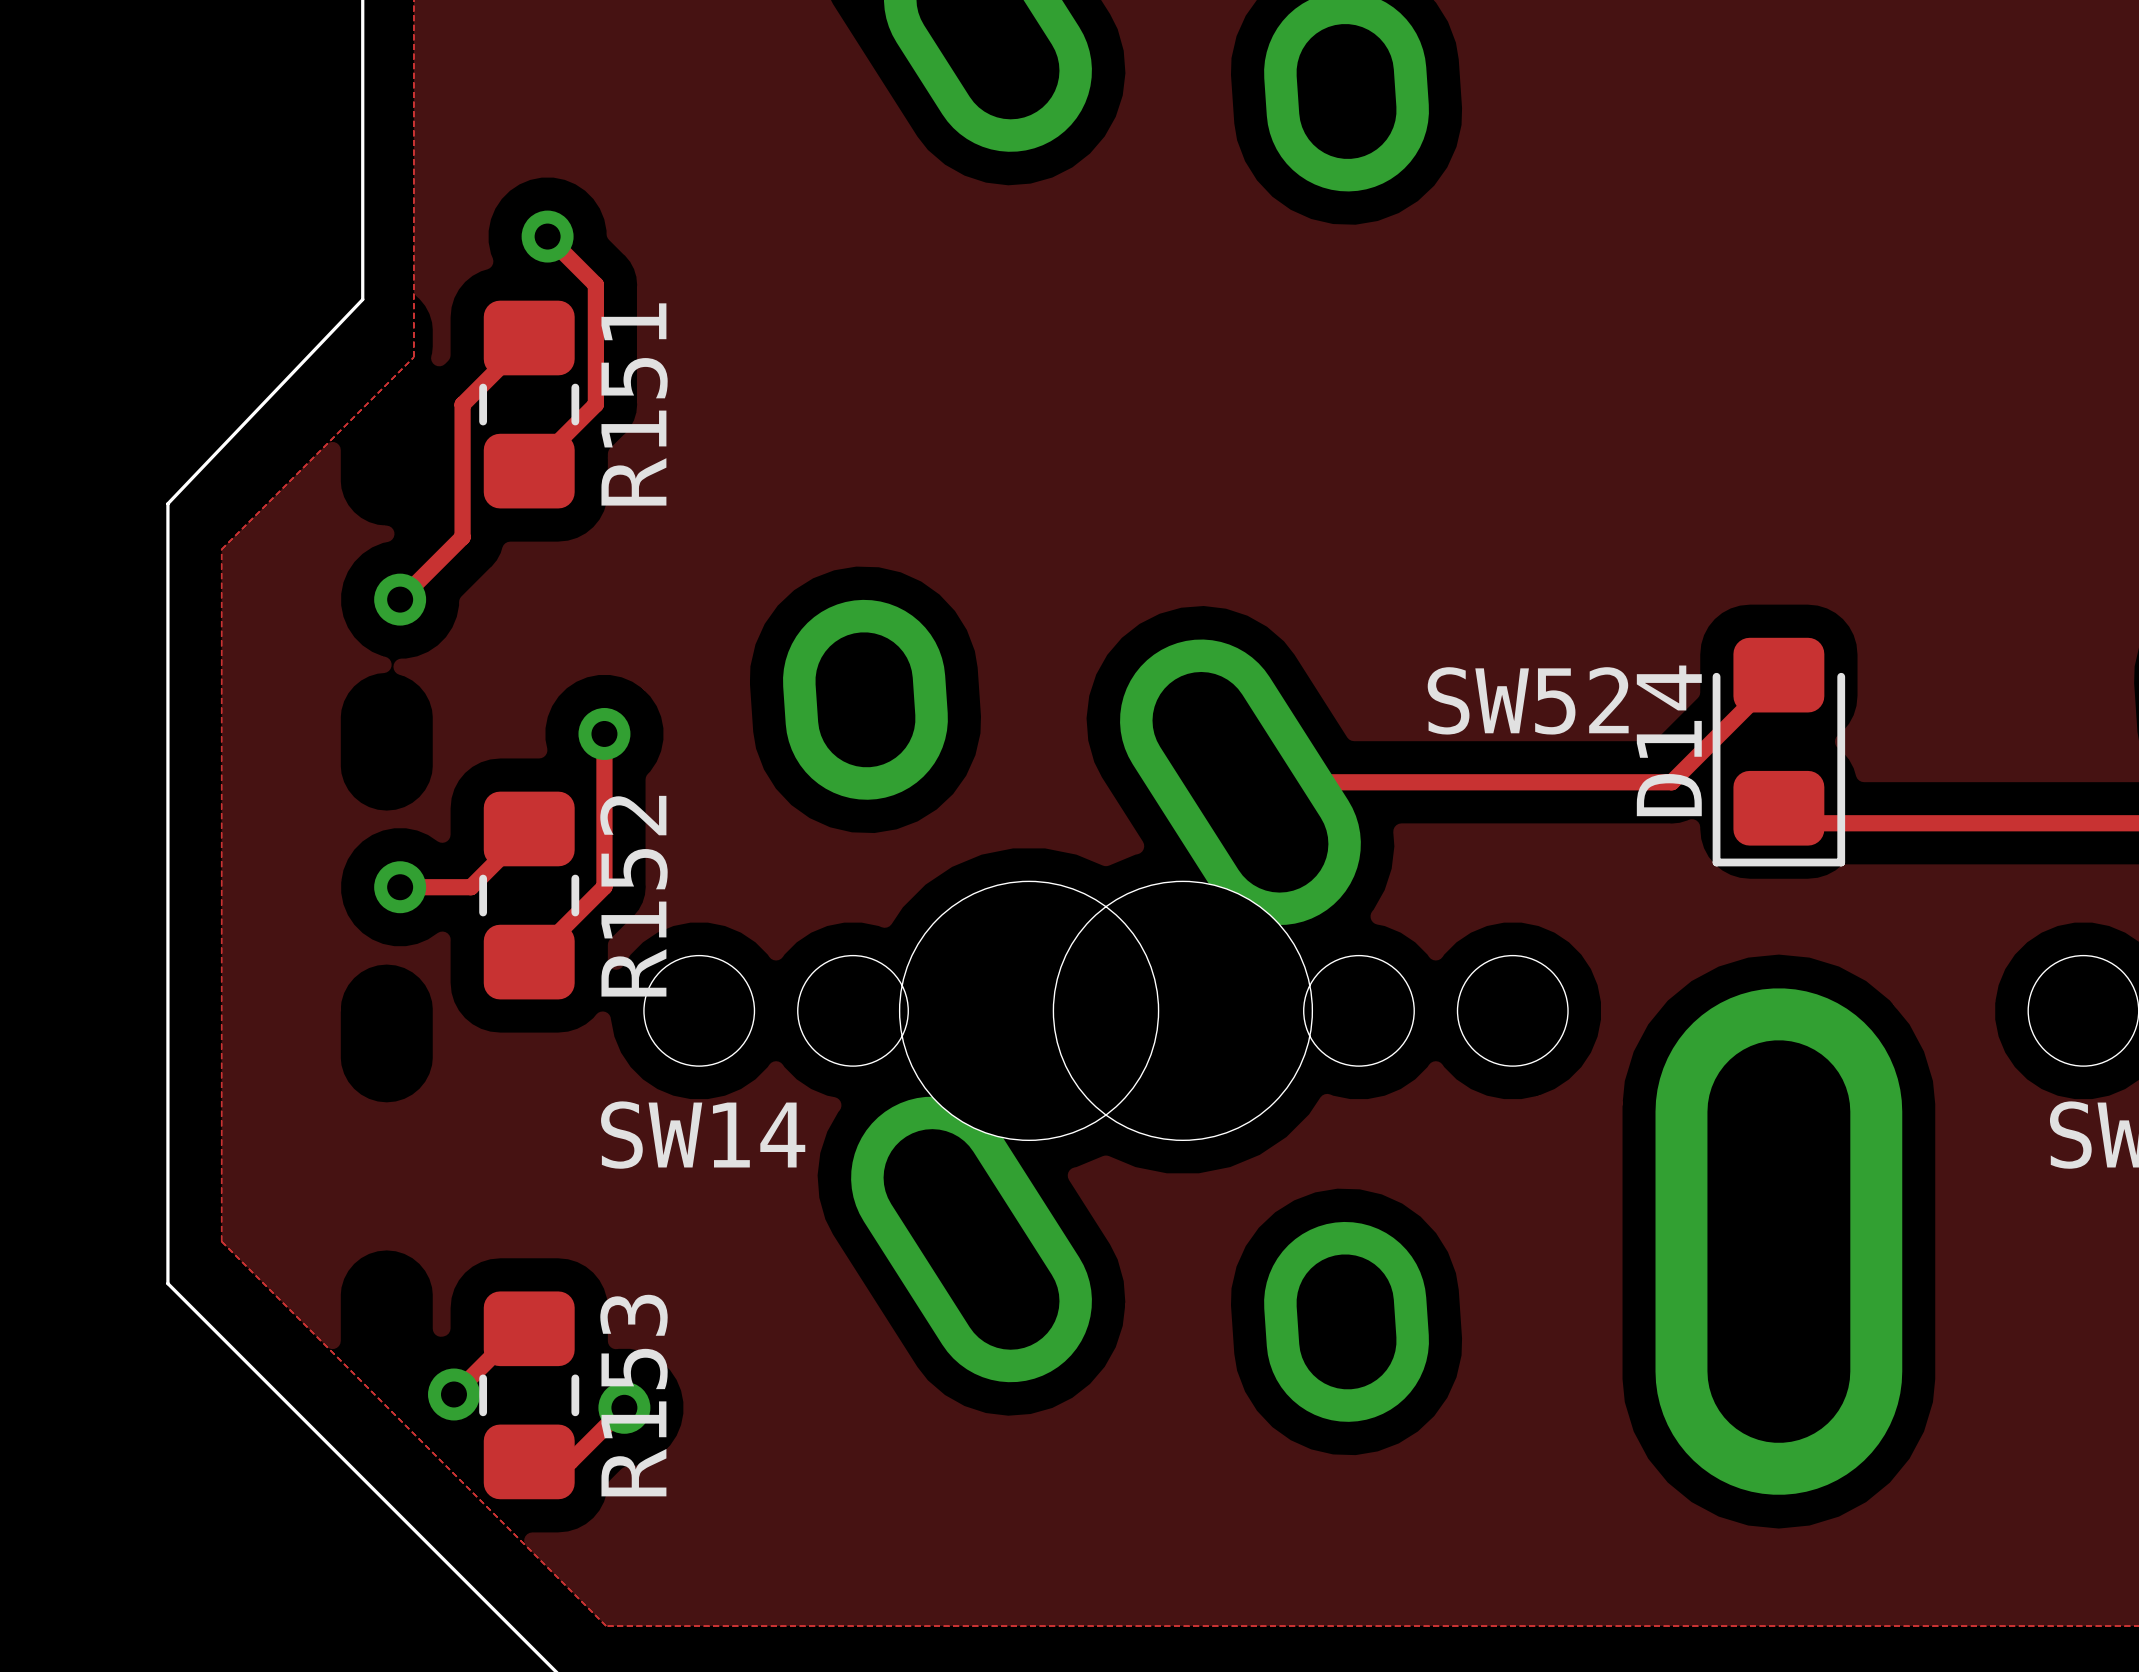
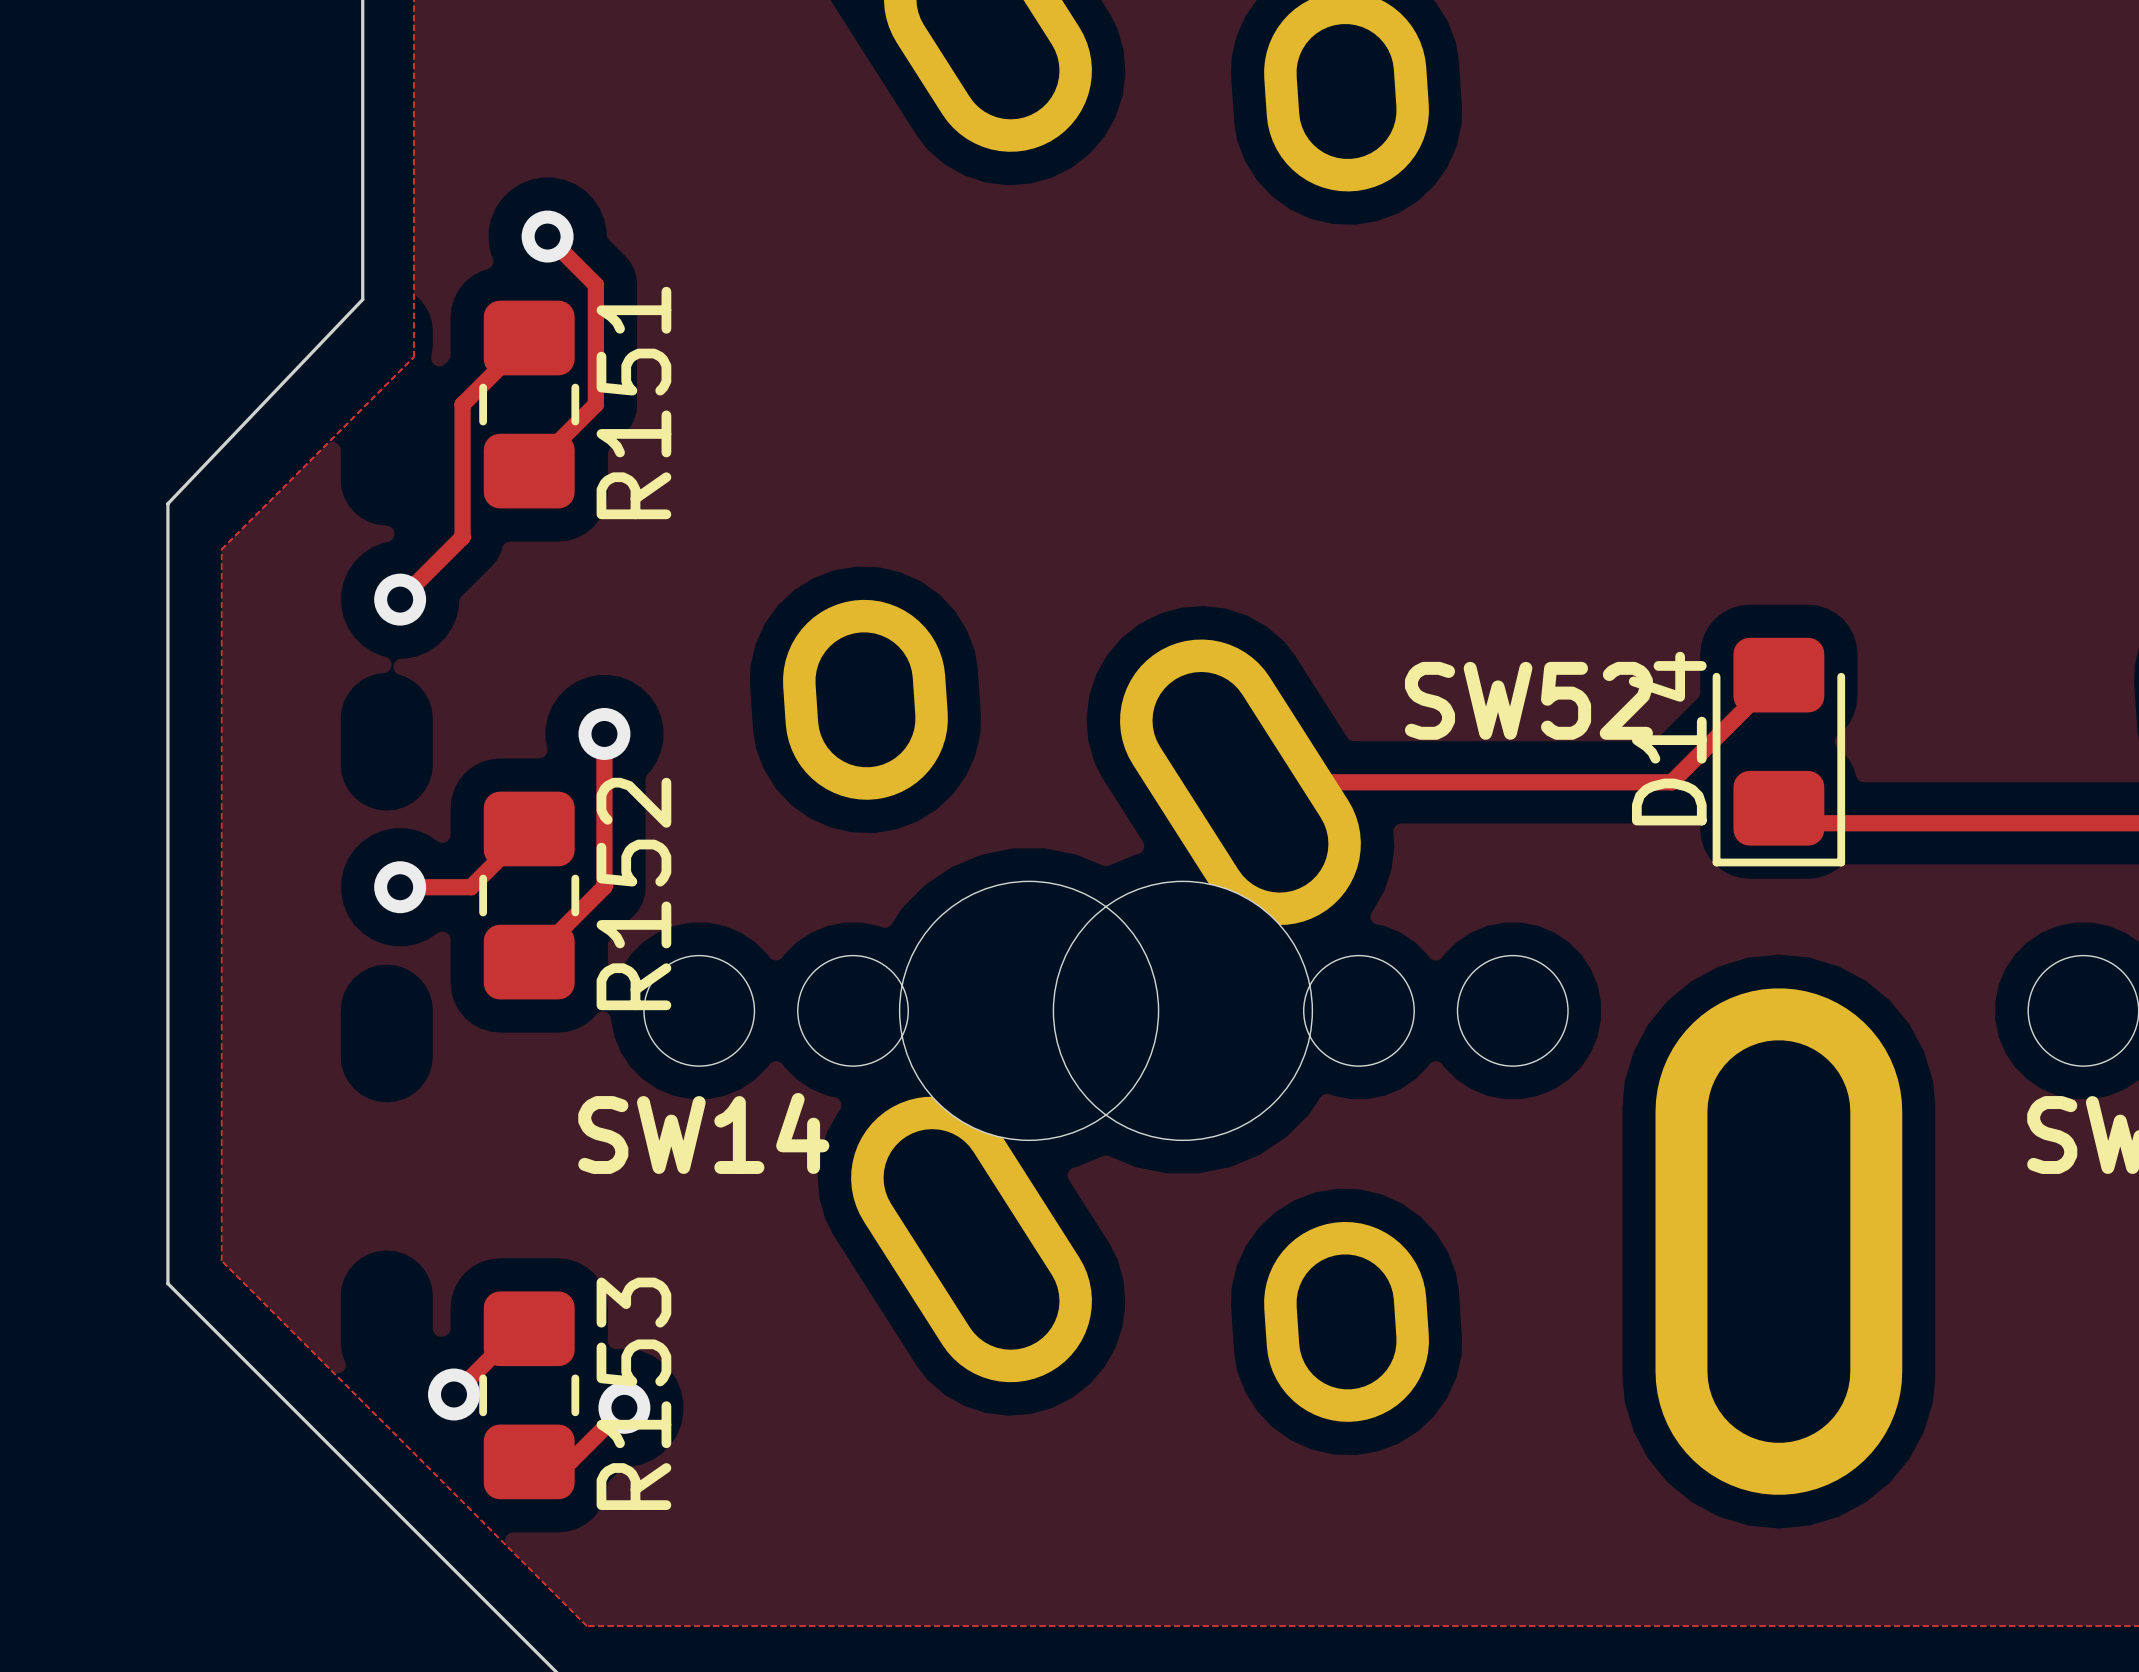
zone outline: (221, 1241) (606, 1626) -> (221, 1241) (221, 1260) (586, 1626) (606, 1626)

